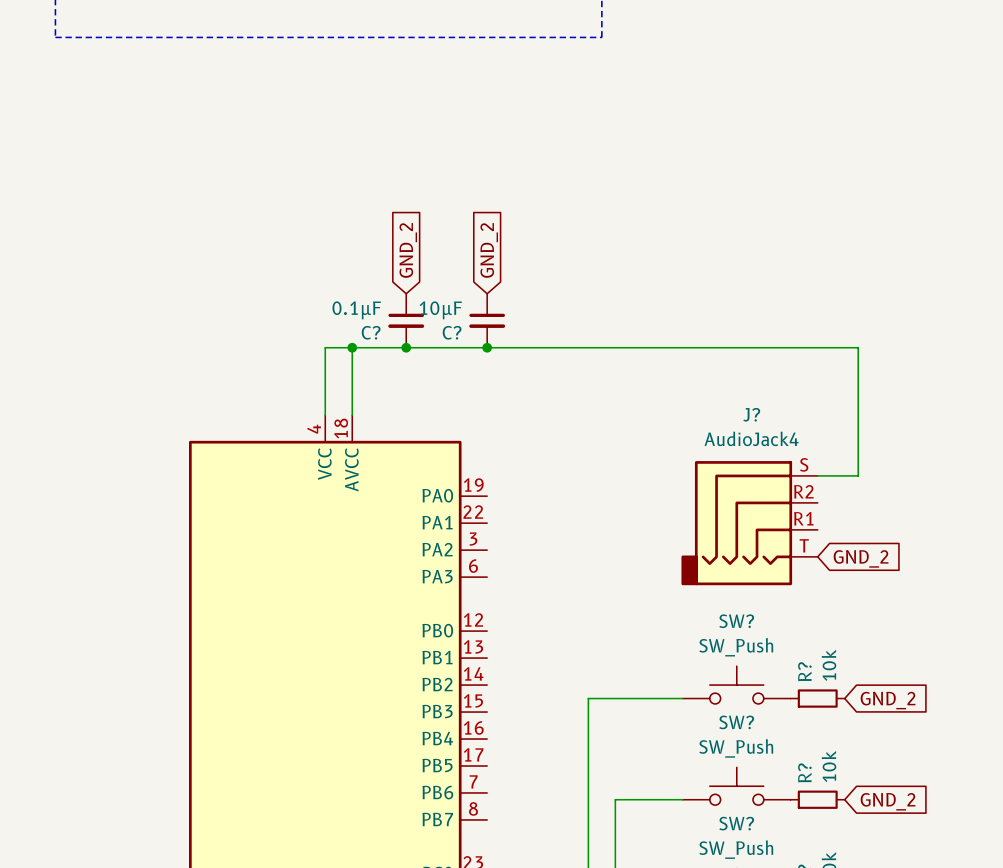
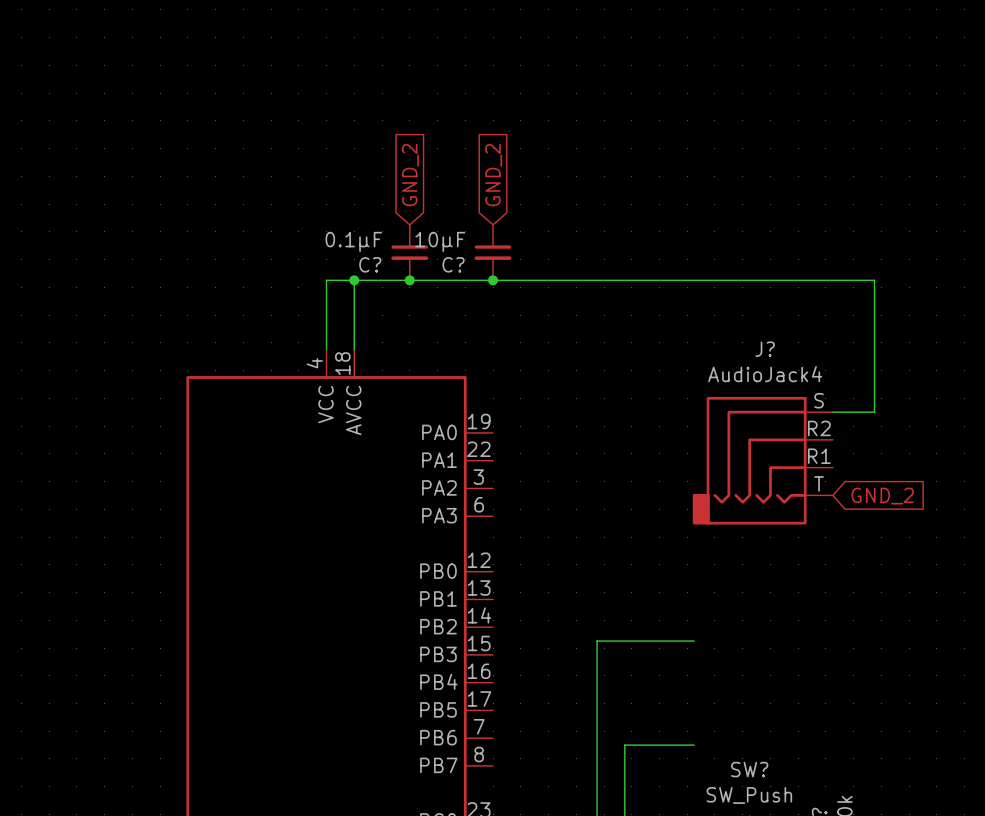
SW?: SW_Push (736, 685) -> none
R?: 10k (817, 698) -> none
global label: GND_2 (888, 700) -> none
SW?: SW_Push (736, 786) -> none
R?: 10k (817, 799) -> none
global label: GND_2 (888, 801) -> none

